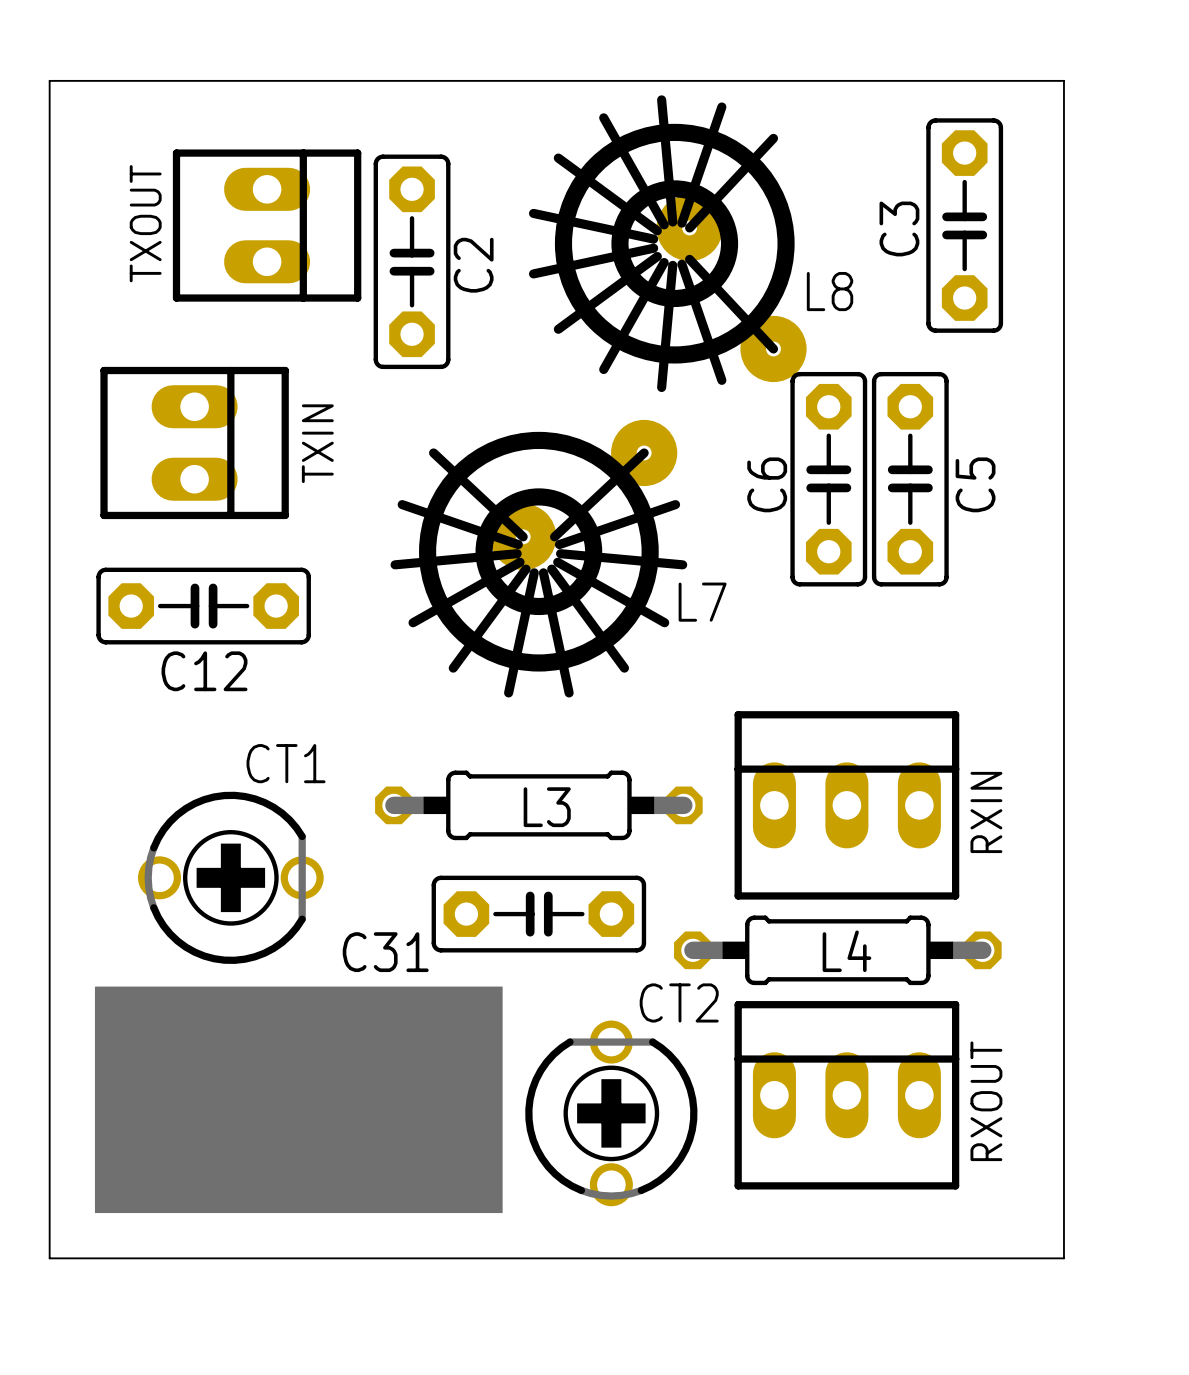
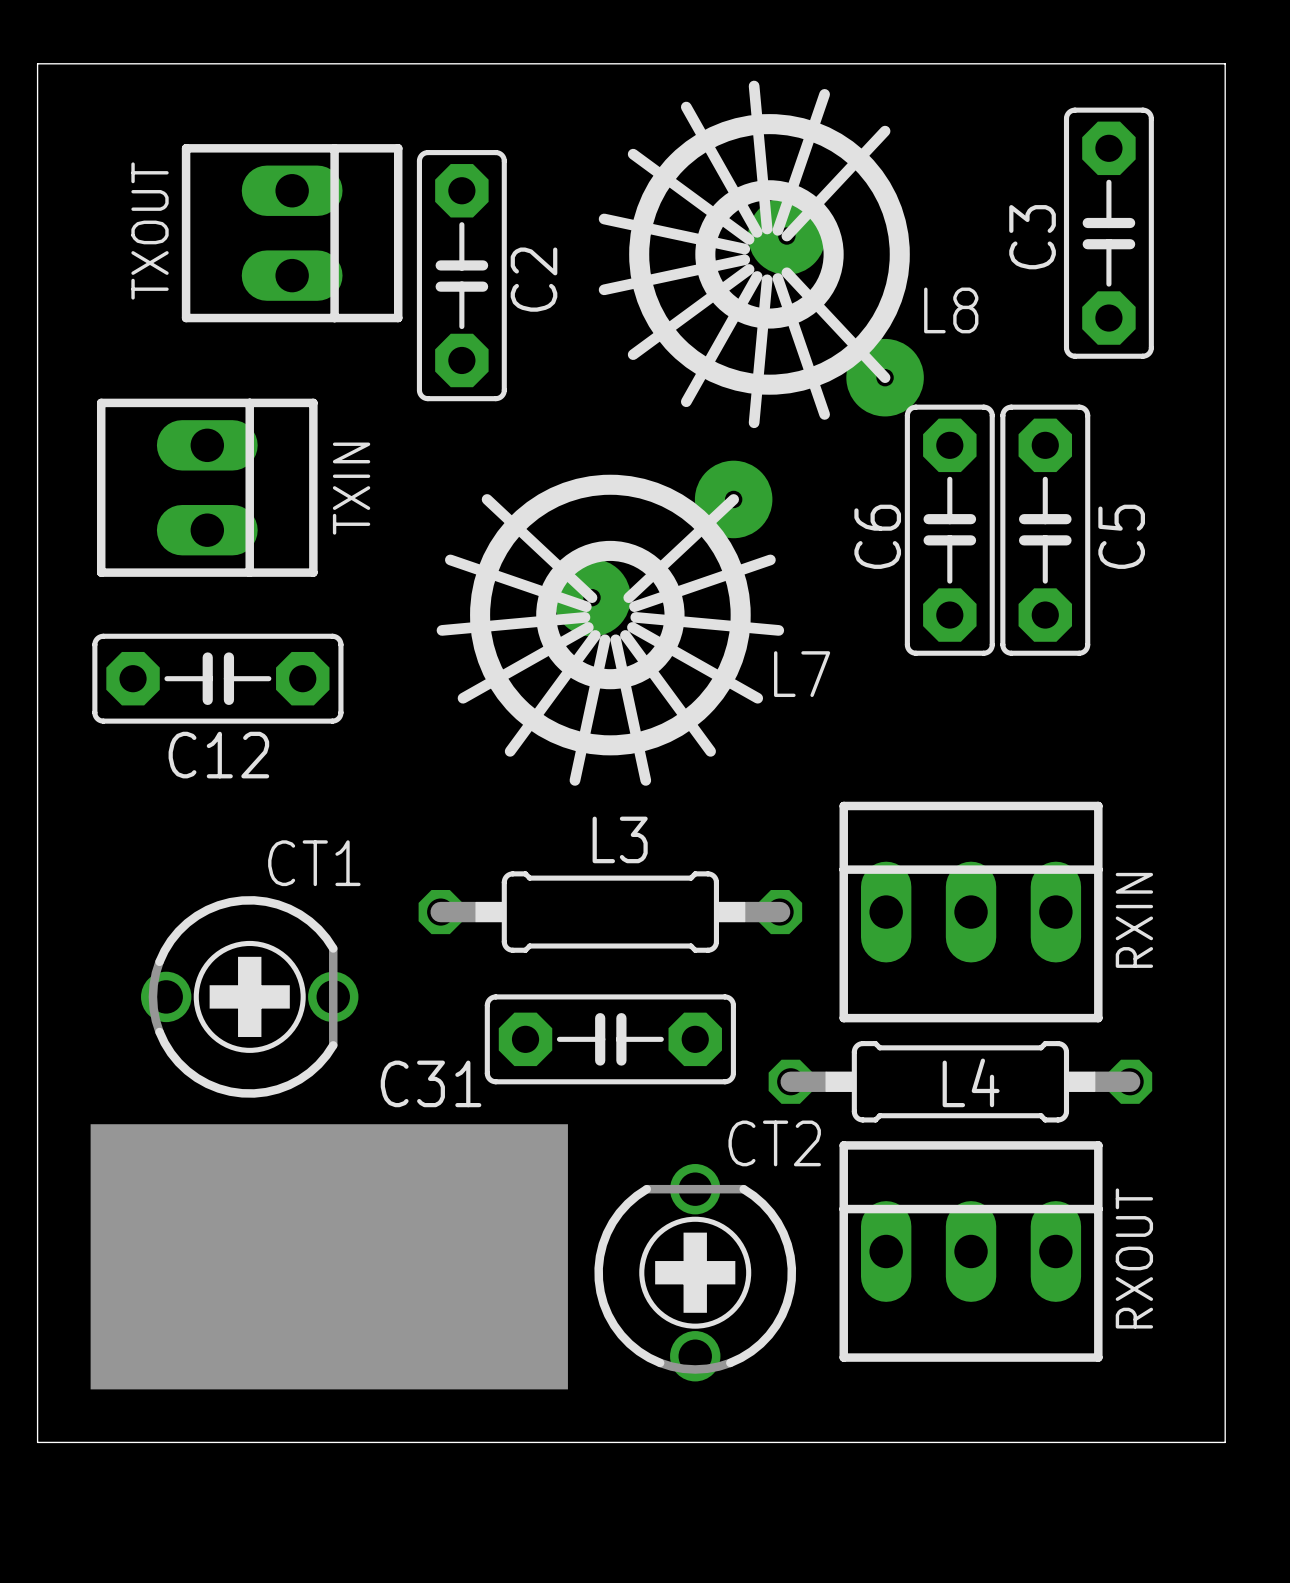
L3 name position: L3 (547, 807) -> L3 (620, 839)

